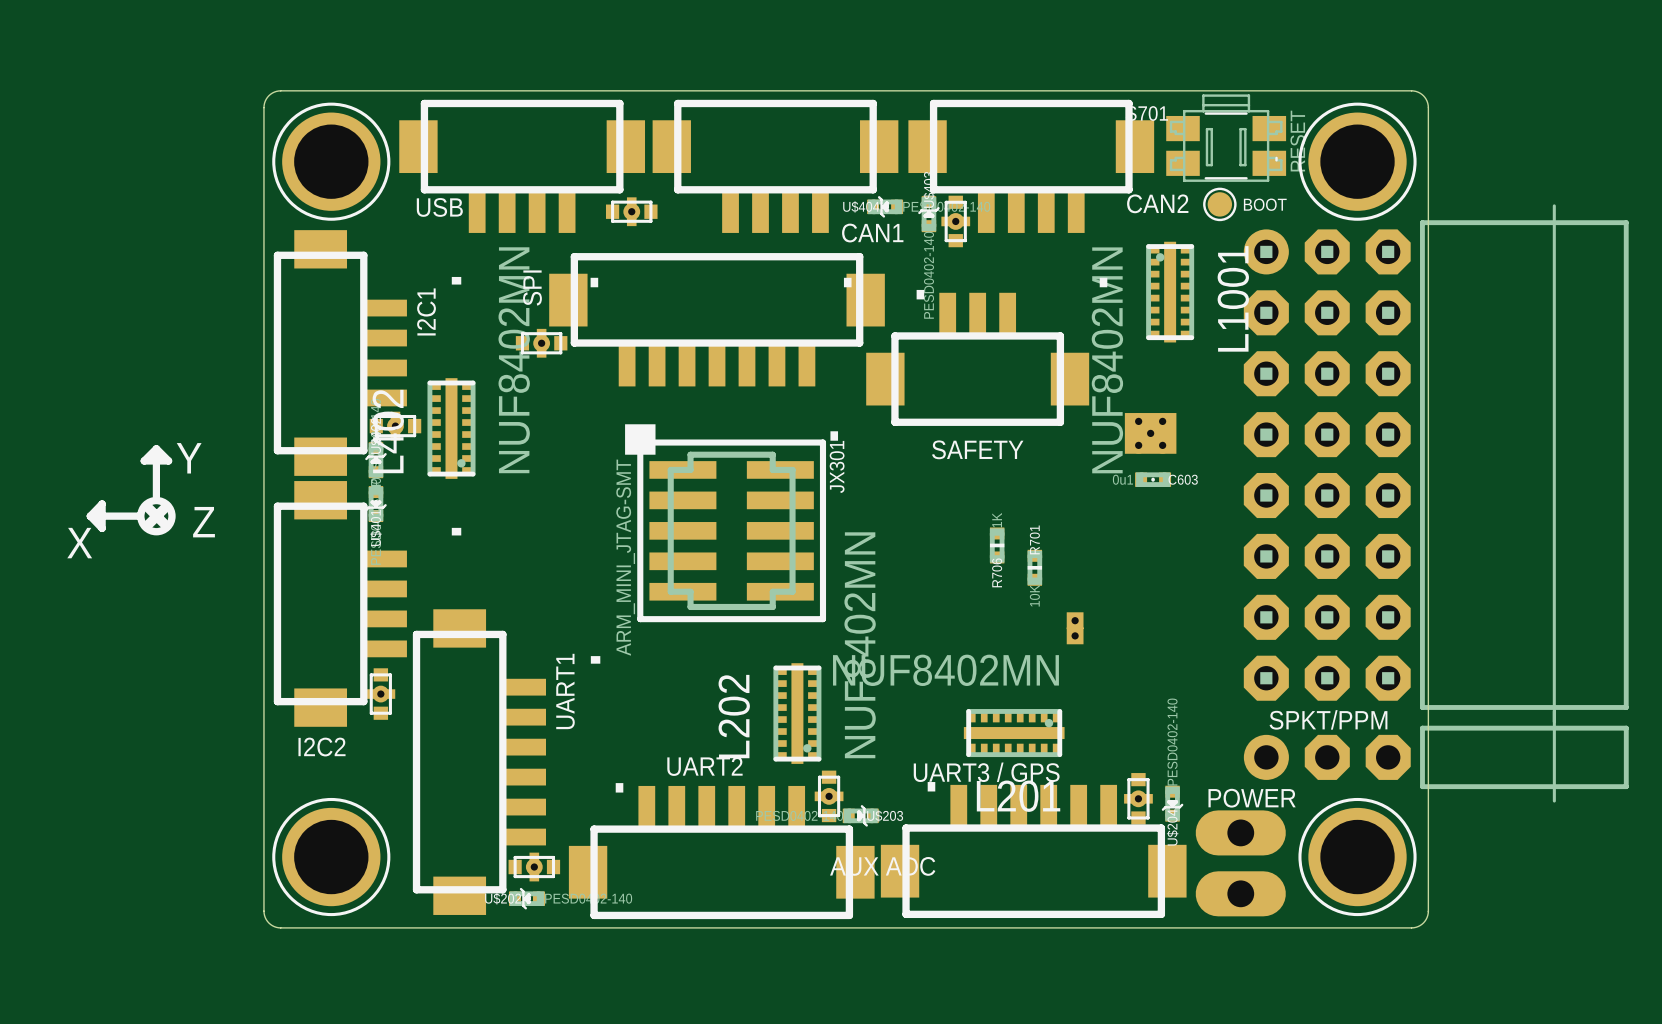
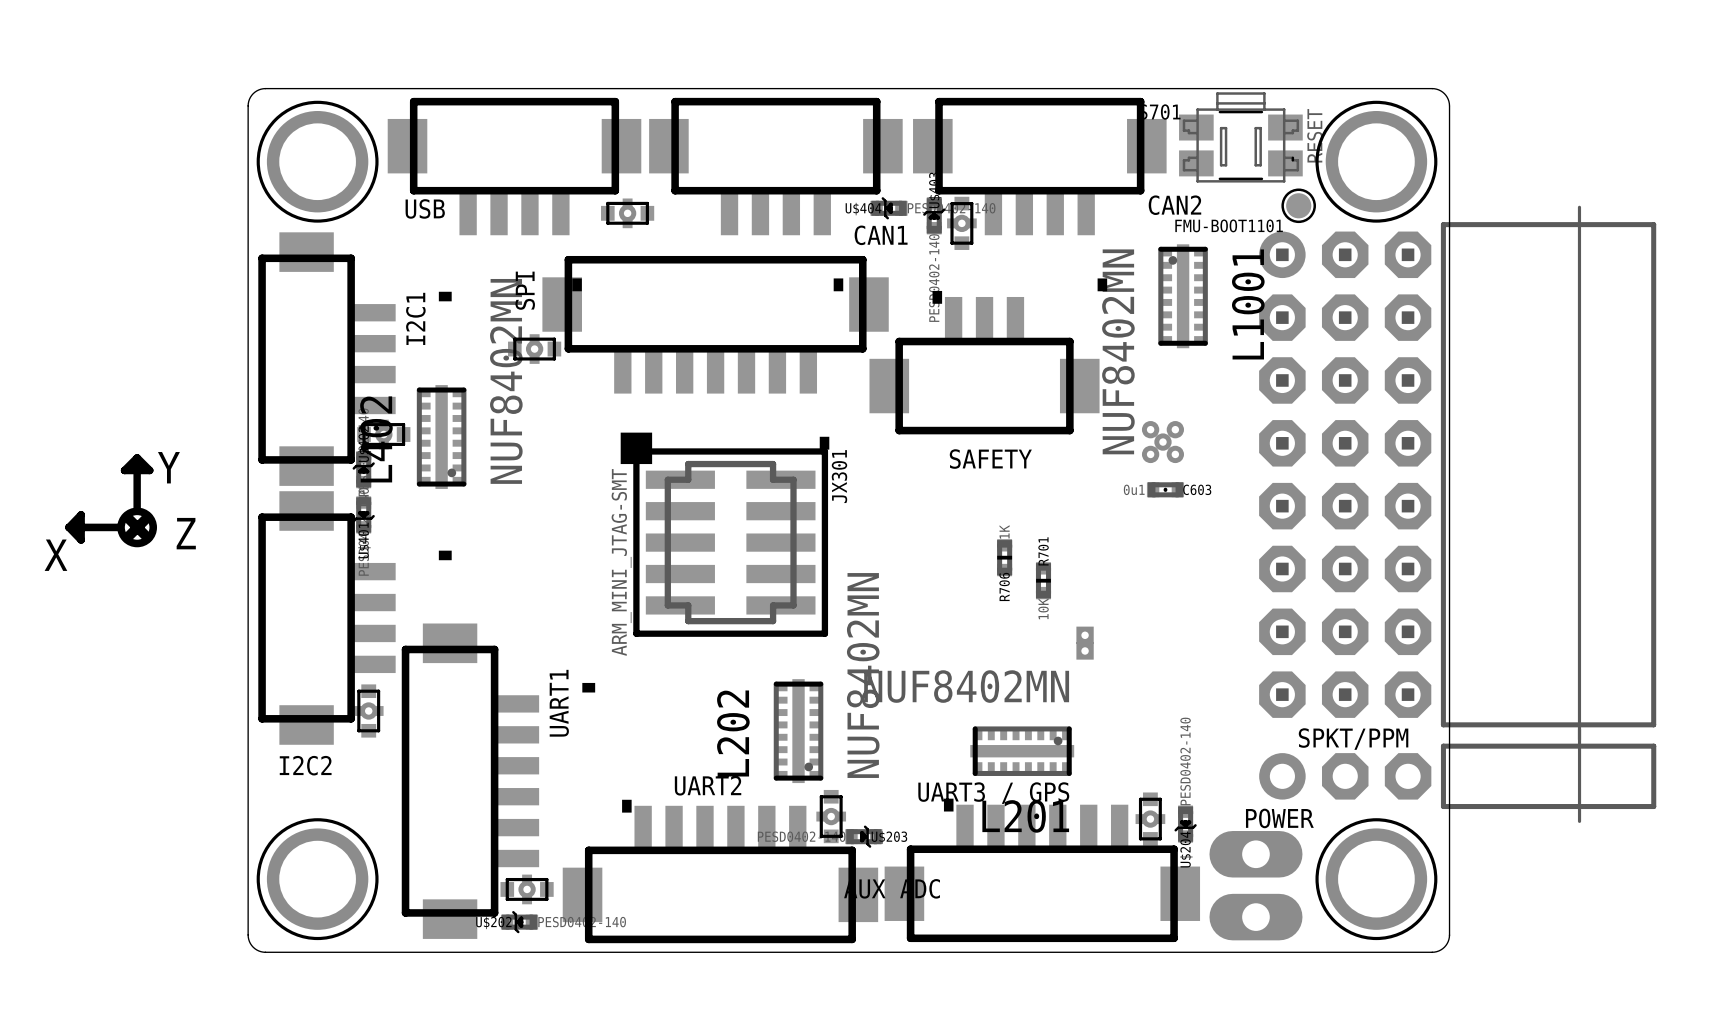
BOOT: (1219, 204) -> none
FMU-BOOT1101: none -> (1298, 205)
part footprint: [1124, 413, 1177, 454] -> [1141, 421, 1185, 464]

